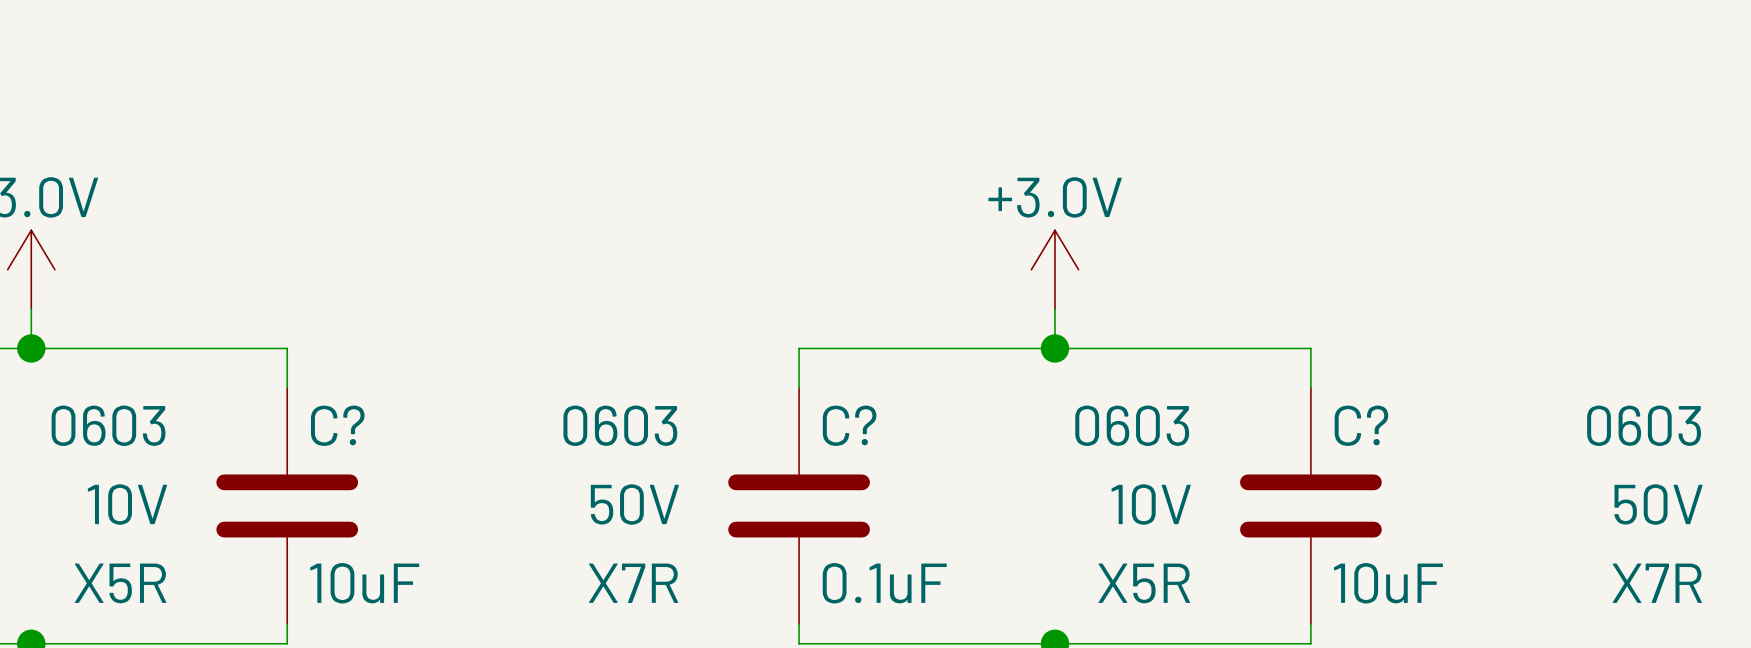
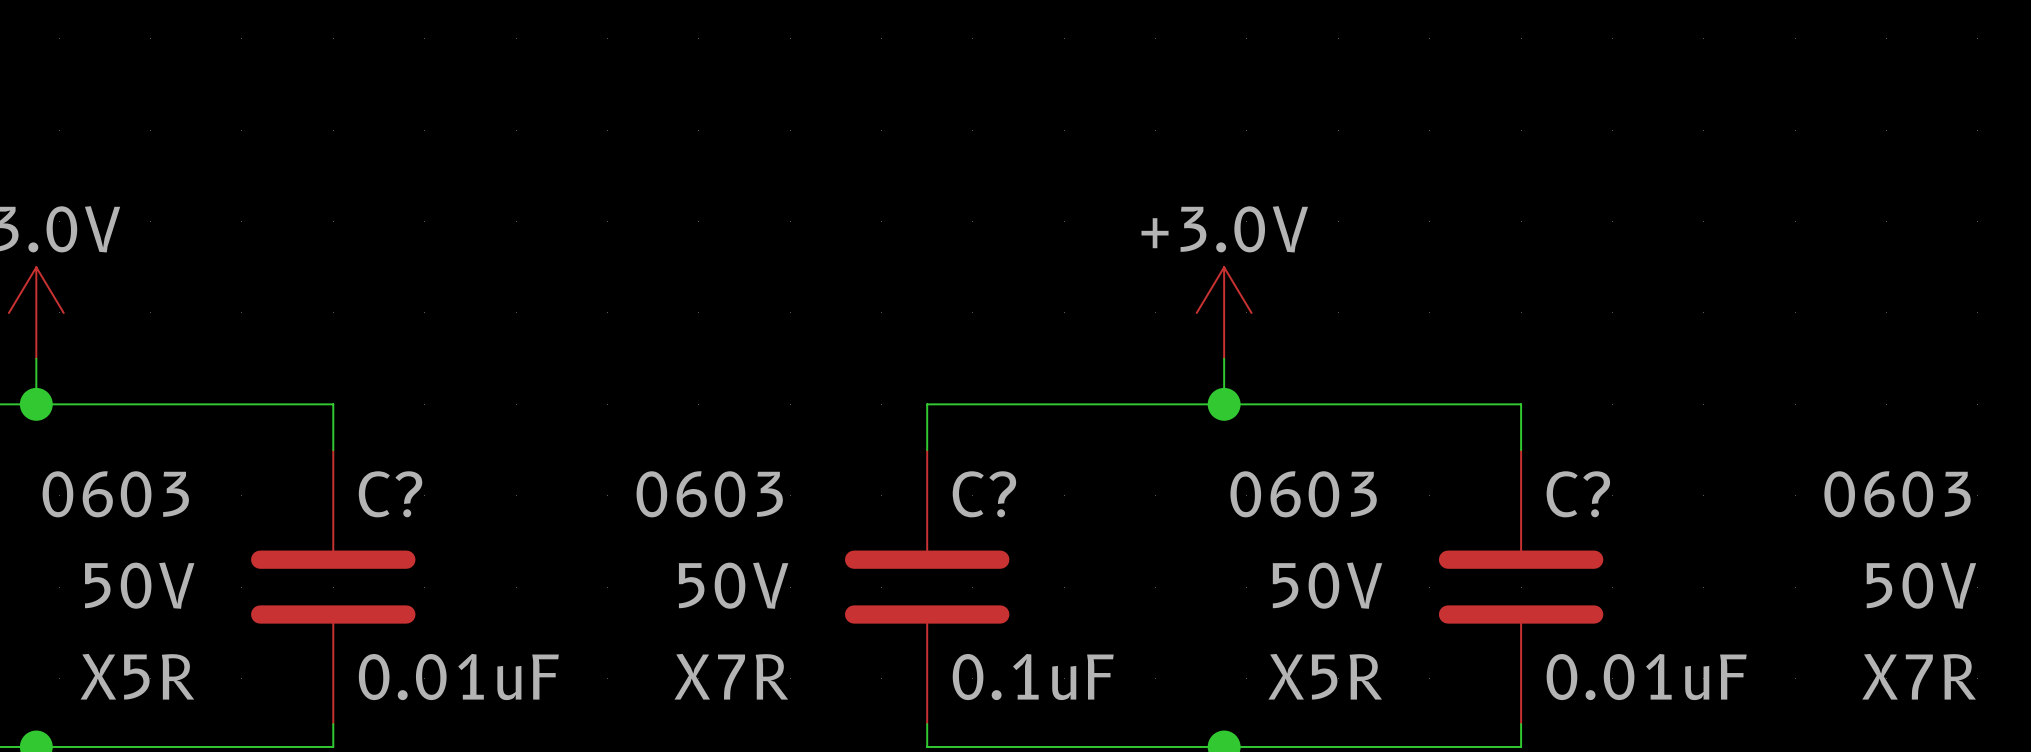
C? text: 10V (127, 504) -> 50V (139, 585)
C? text: 10V (1151, 504) -> 50V (1327, 585)
C? value: 10uF (364, 583) -> 0.01uF (458, 677)
C? value: 10uF (1388, 583) -> 0.01uF (1646, 677)

